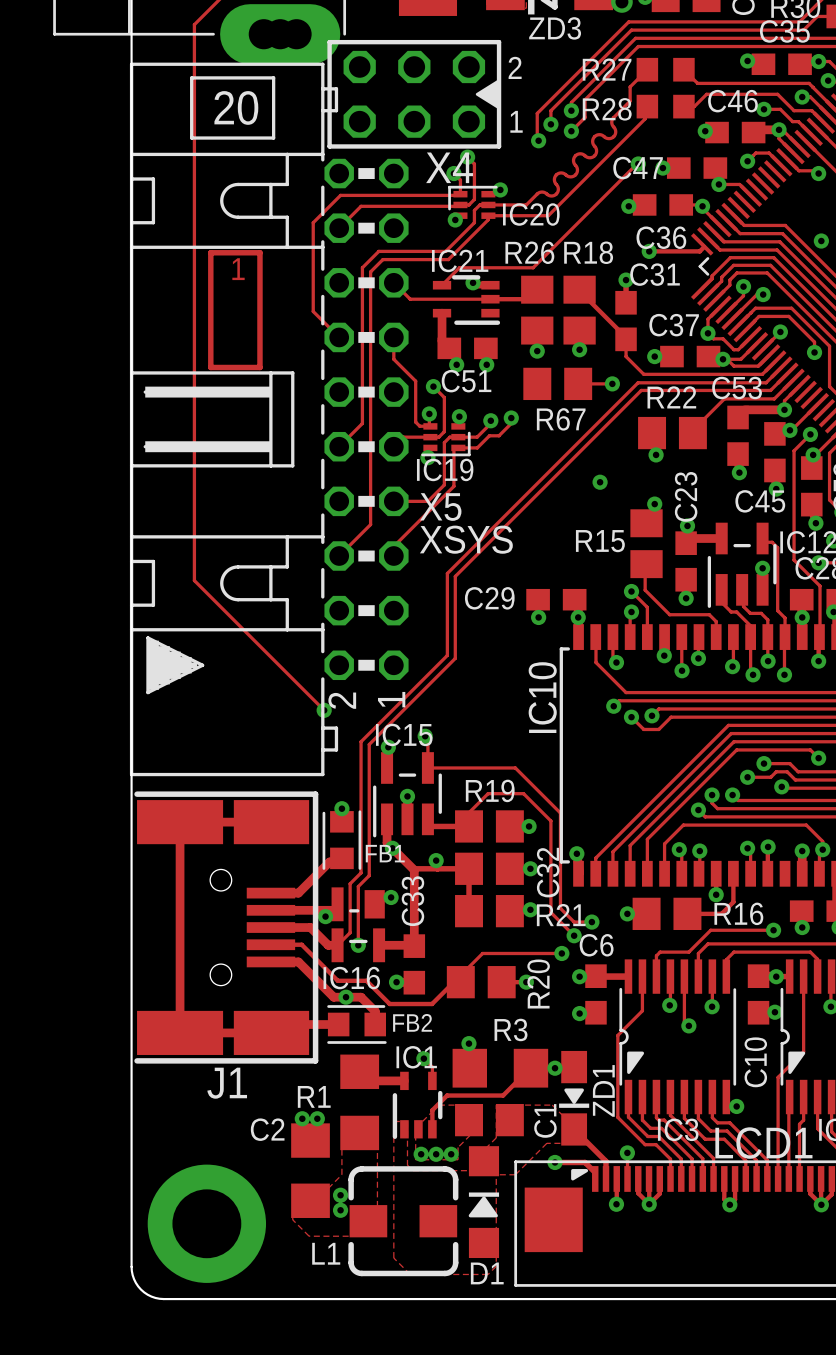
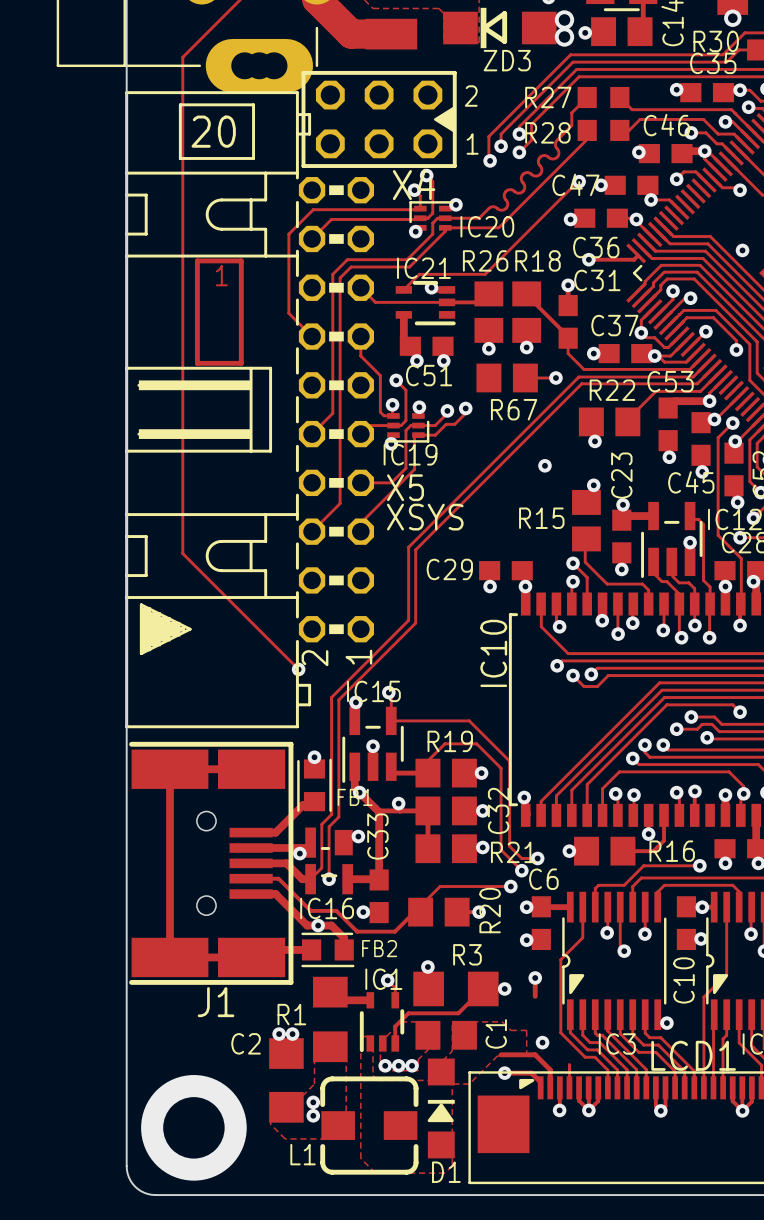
track: none -> (535, 977) (535, 996)
via: none -> (535, 977)
ZD1: (574, 1098) -> none
track: (574, 1129) (606, 1161) -> (501, 1054) (535, 1054) (550, 1072)
via position: (627, 1152) -> (542, 1042)

